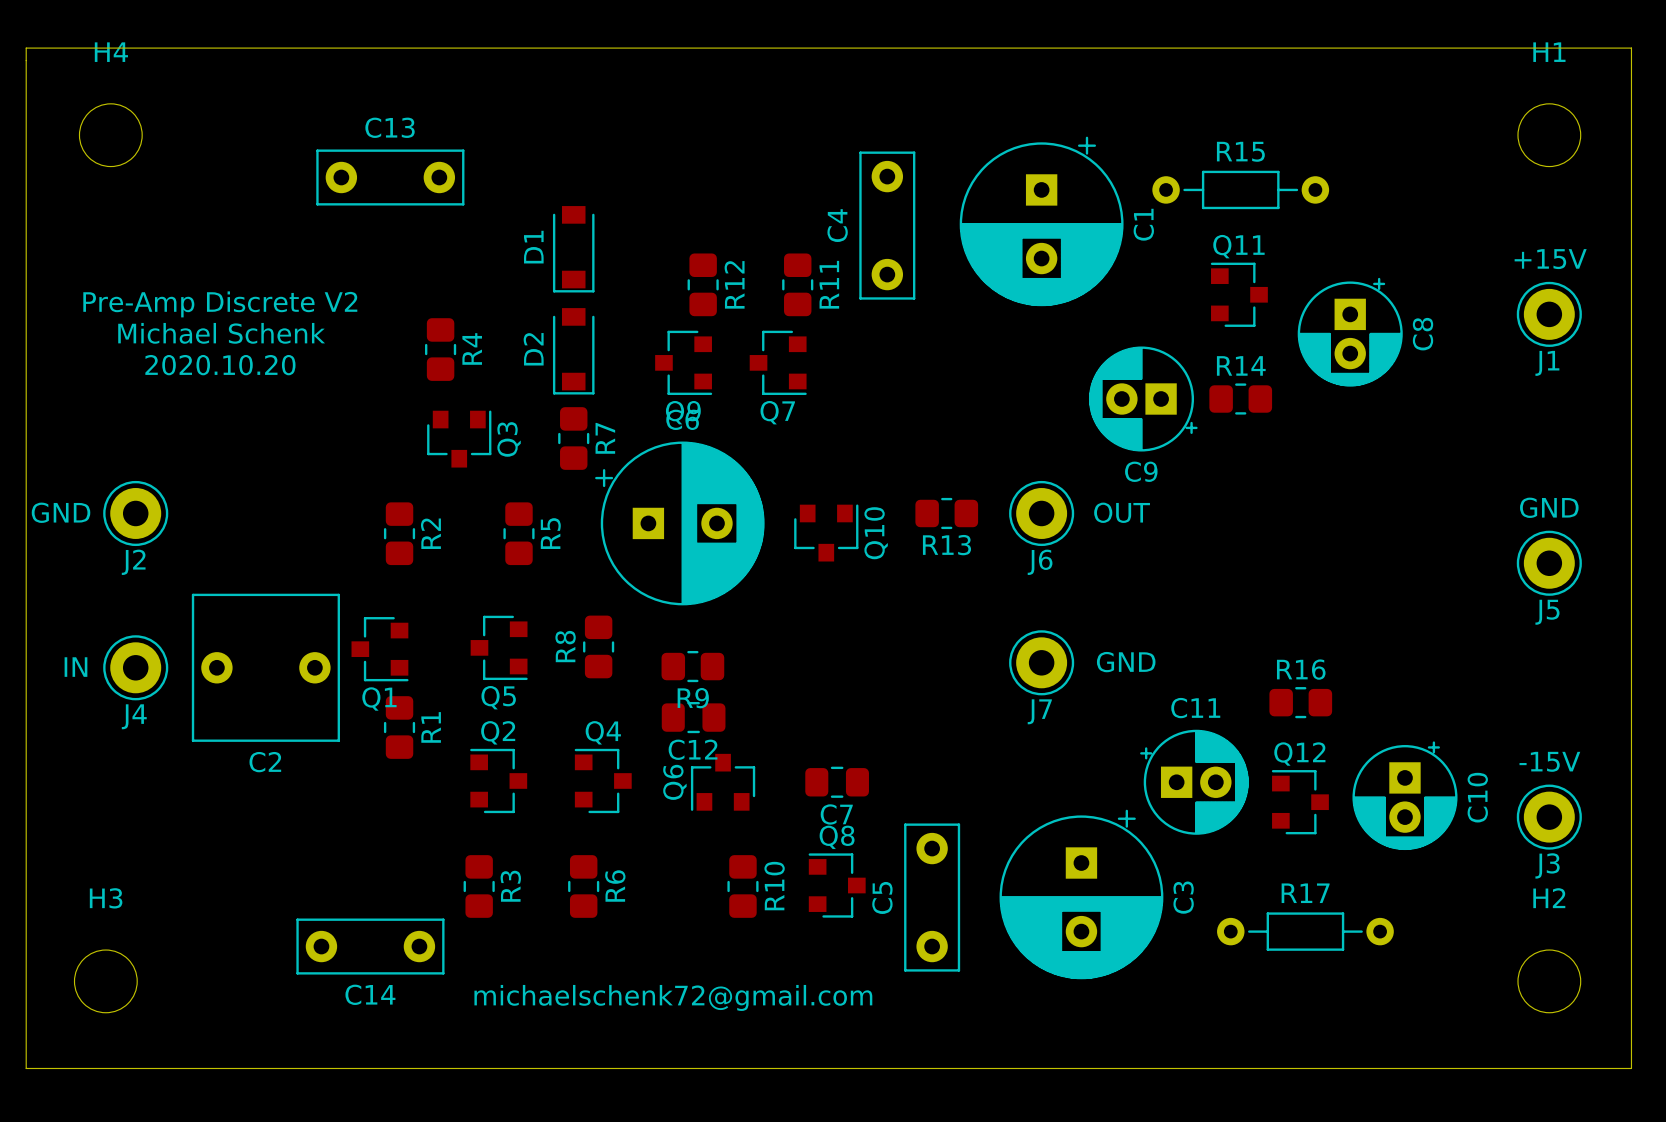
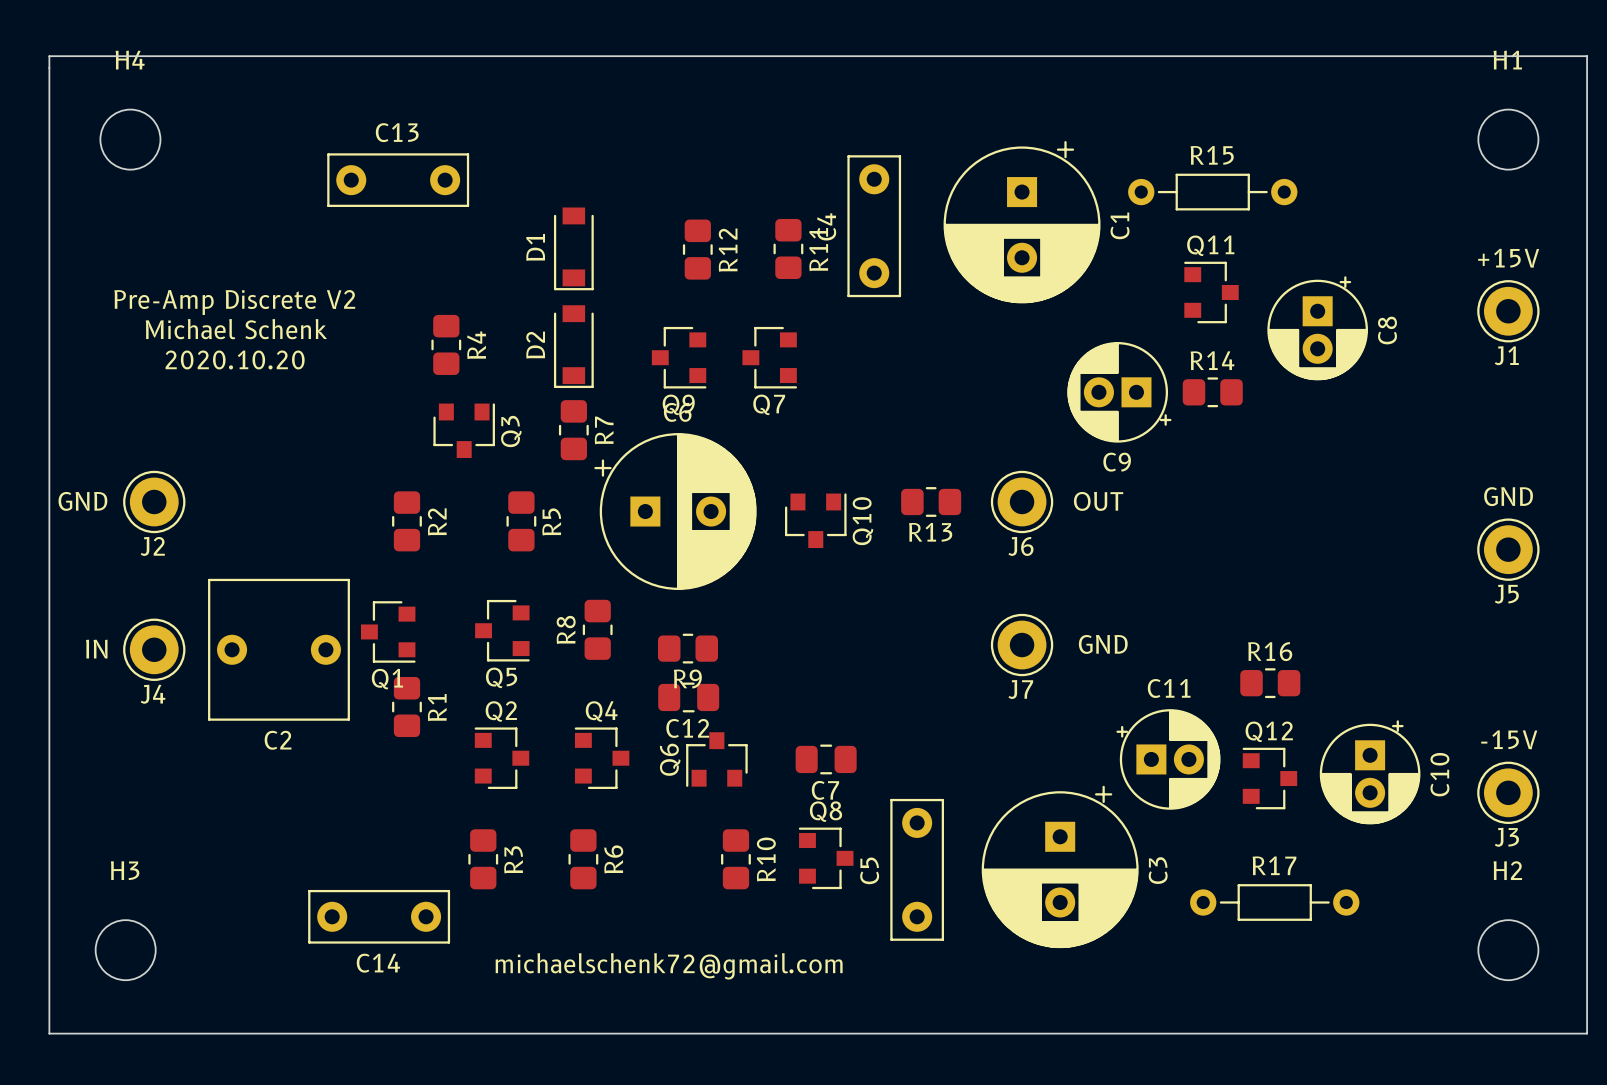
R12 position: (703, 284) -> (697, 249)
R11 position: (797, 284) -> (788, 248)

